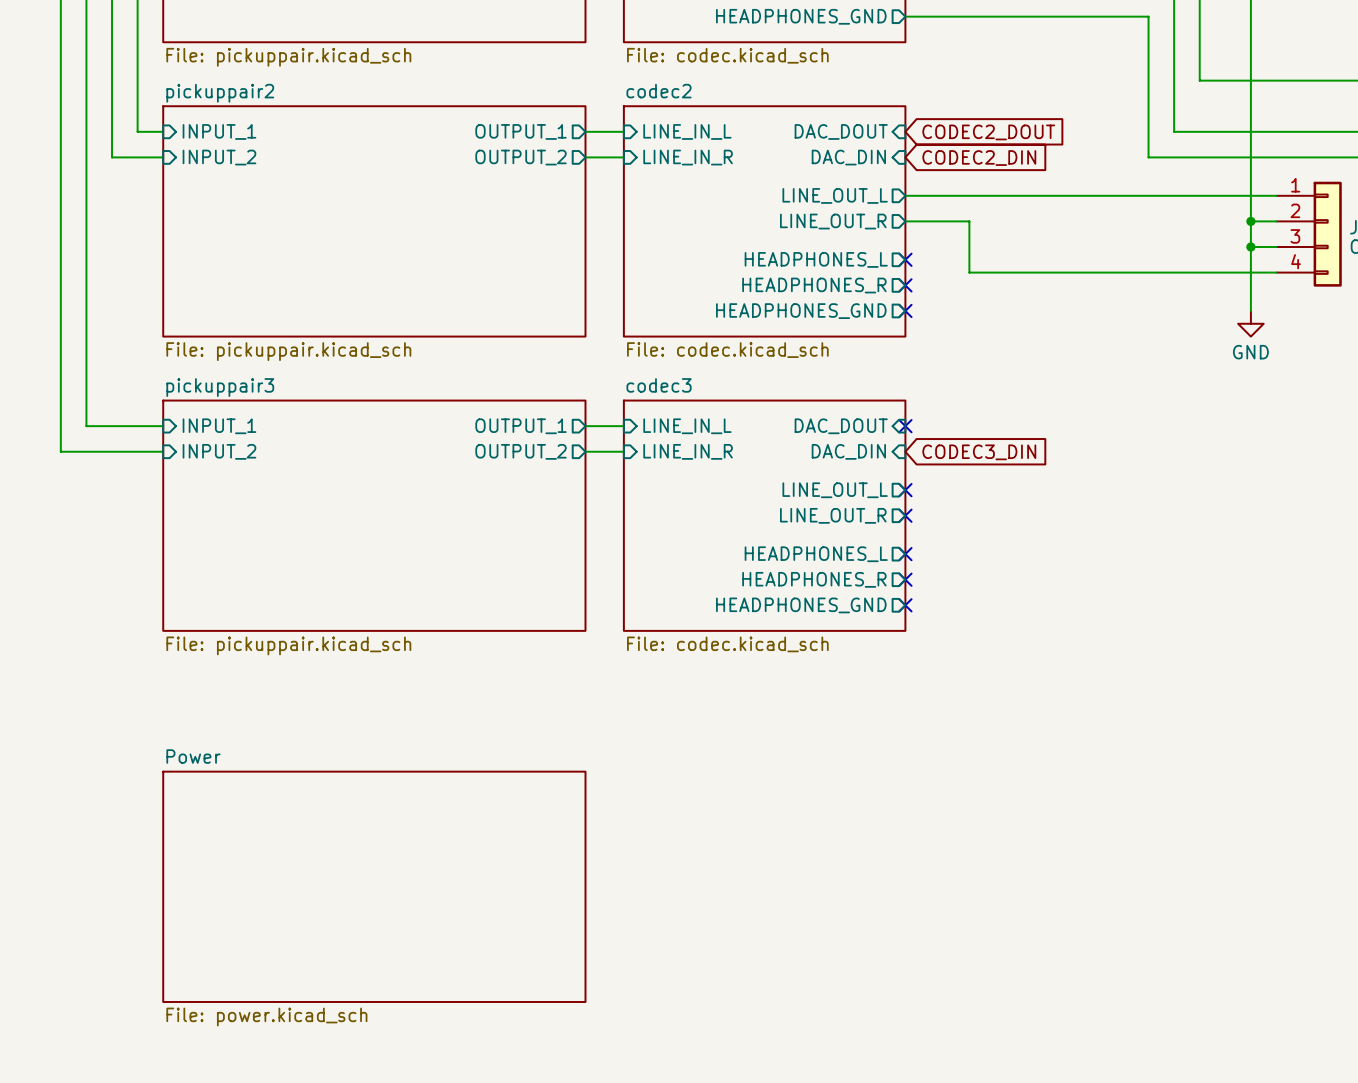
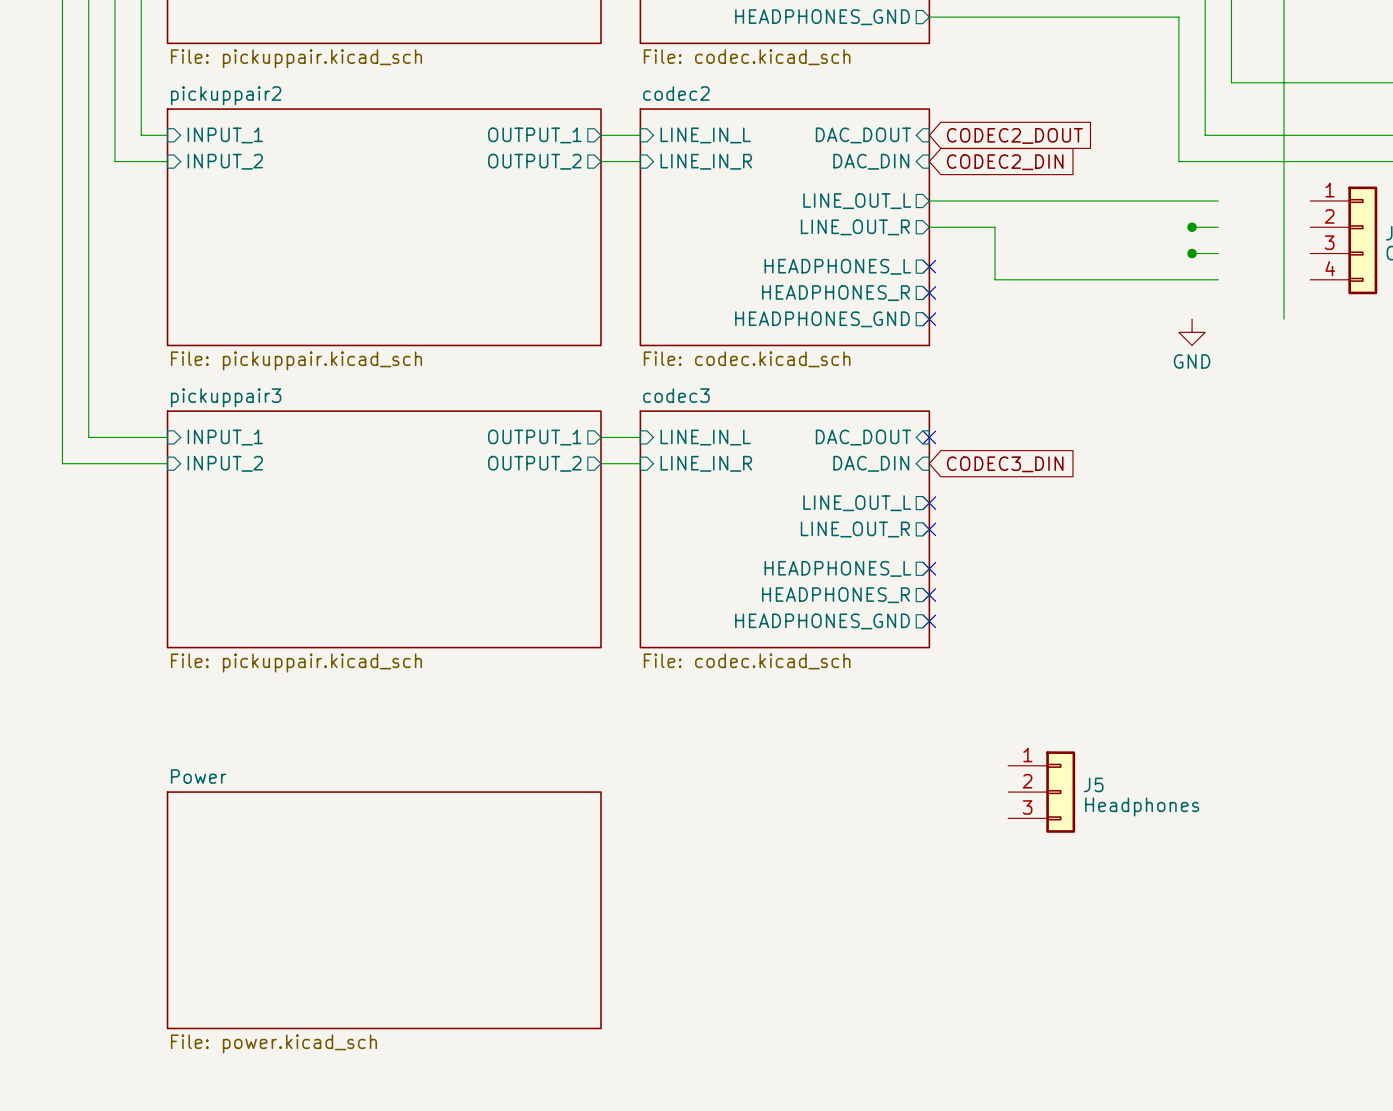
wire: (1186, 195) (1276, 195) -> none
junction: none -> (1192, 227)
wire: (1250, 221) (1276, 221) -> (1192, 227) (1218, 227)
junction: (1250, 221) -> none
junction: none -> (1192, 253)
wire: (1250, 246) (1276, 246) -> (1192, 253) (1218, 253)
junction: (1250, 246) -> none
wire: (1186, 272) (1276, 272) -> none
power symbol position: GND (1250, 323) -> GND (1192, 332)
J5: none -> Headphones (1041, 792)

